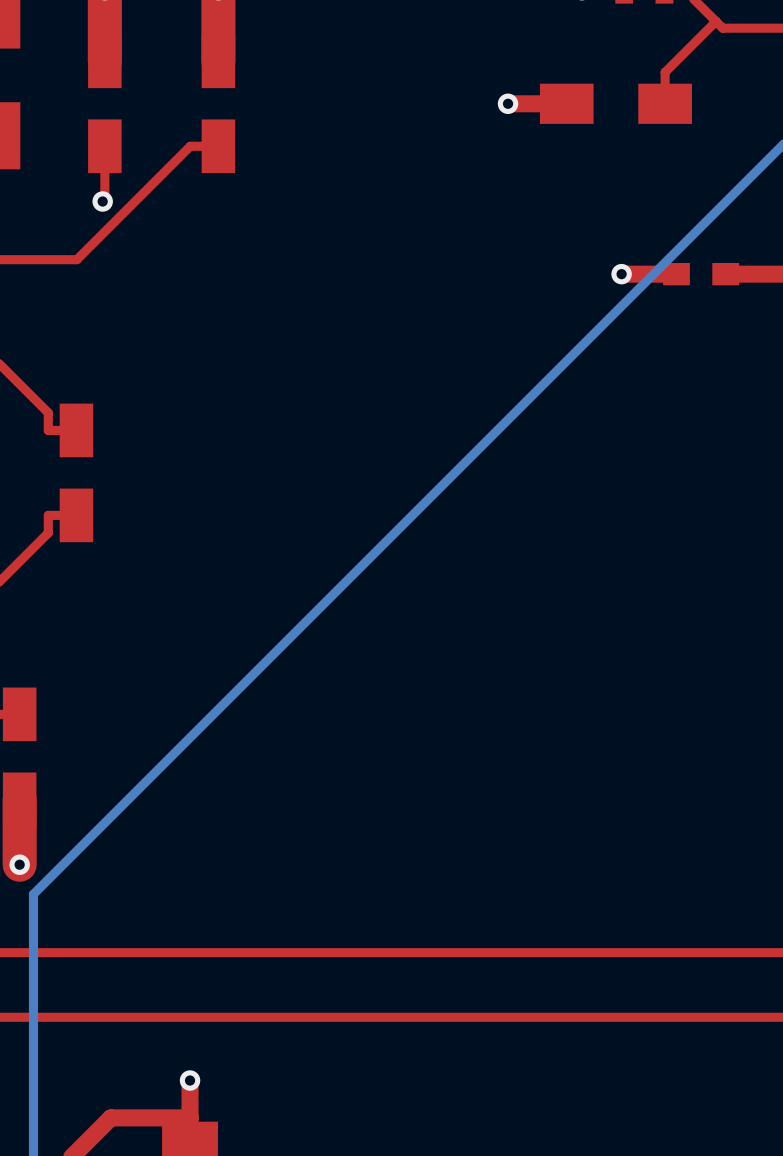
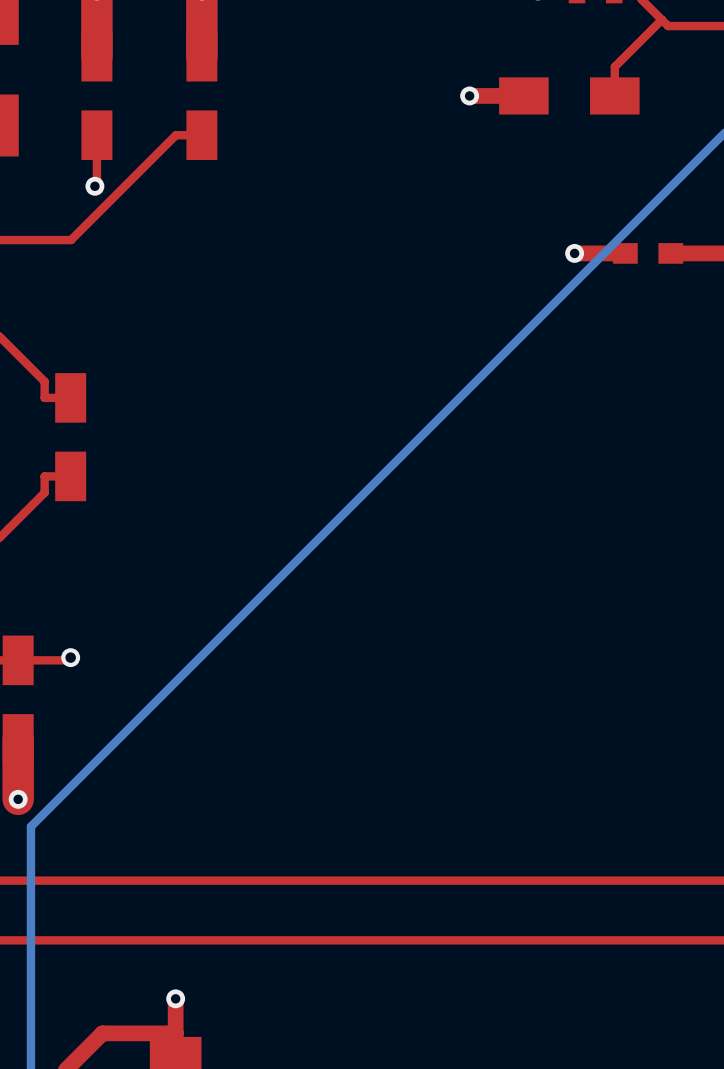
top track: none -> (70, 657) (67, 660) (18, 660)
via: none -> (70, 657)

